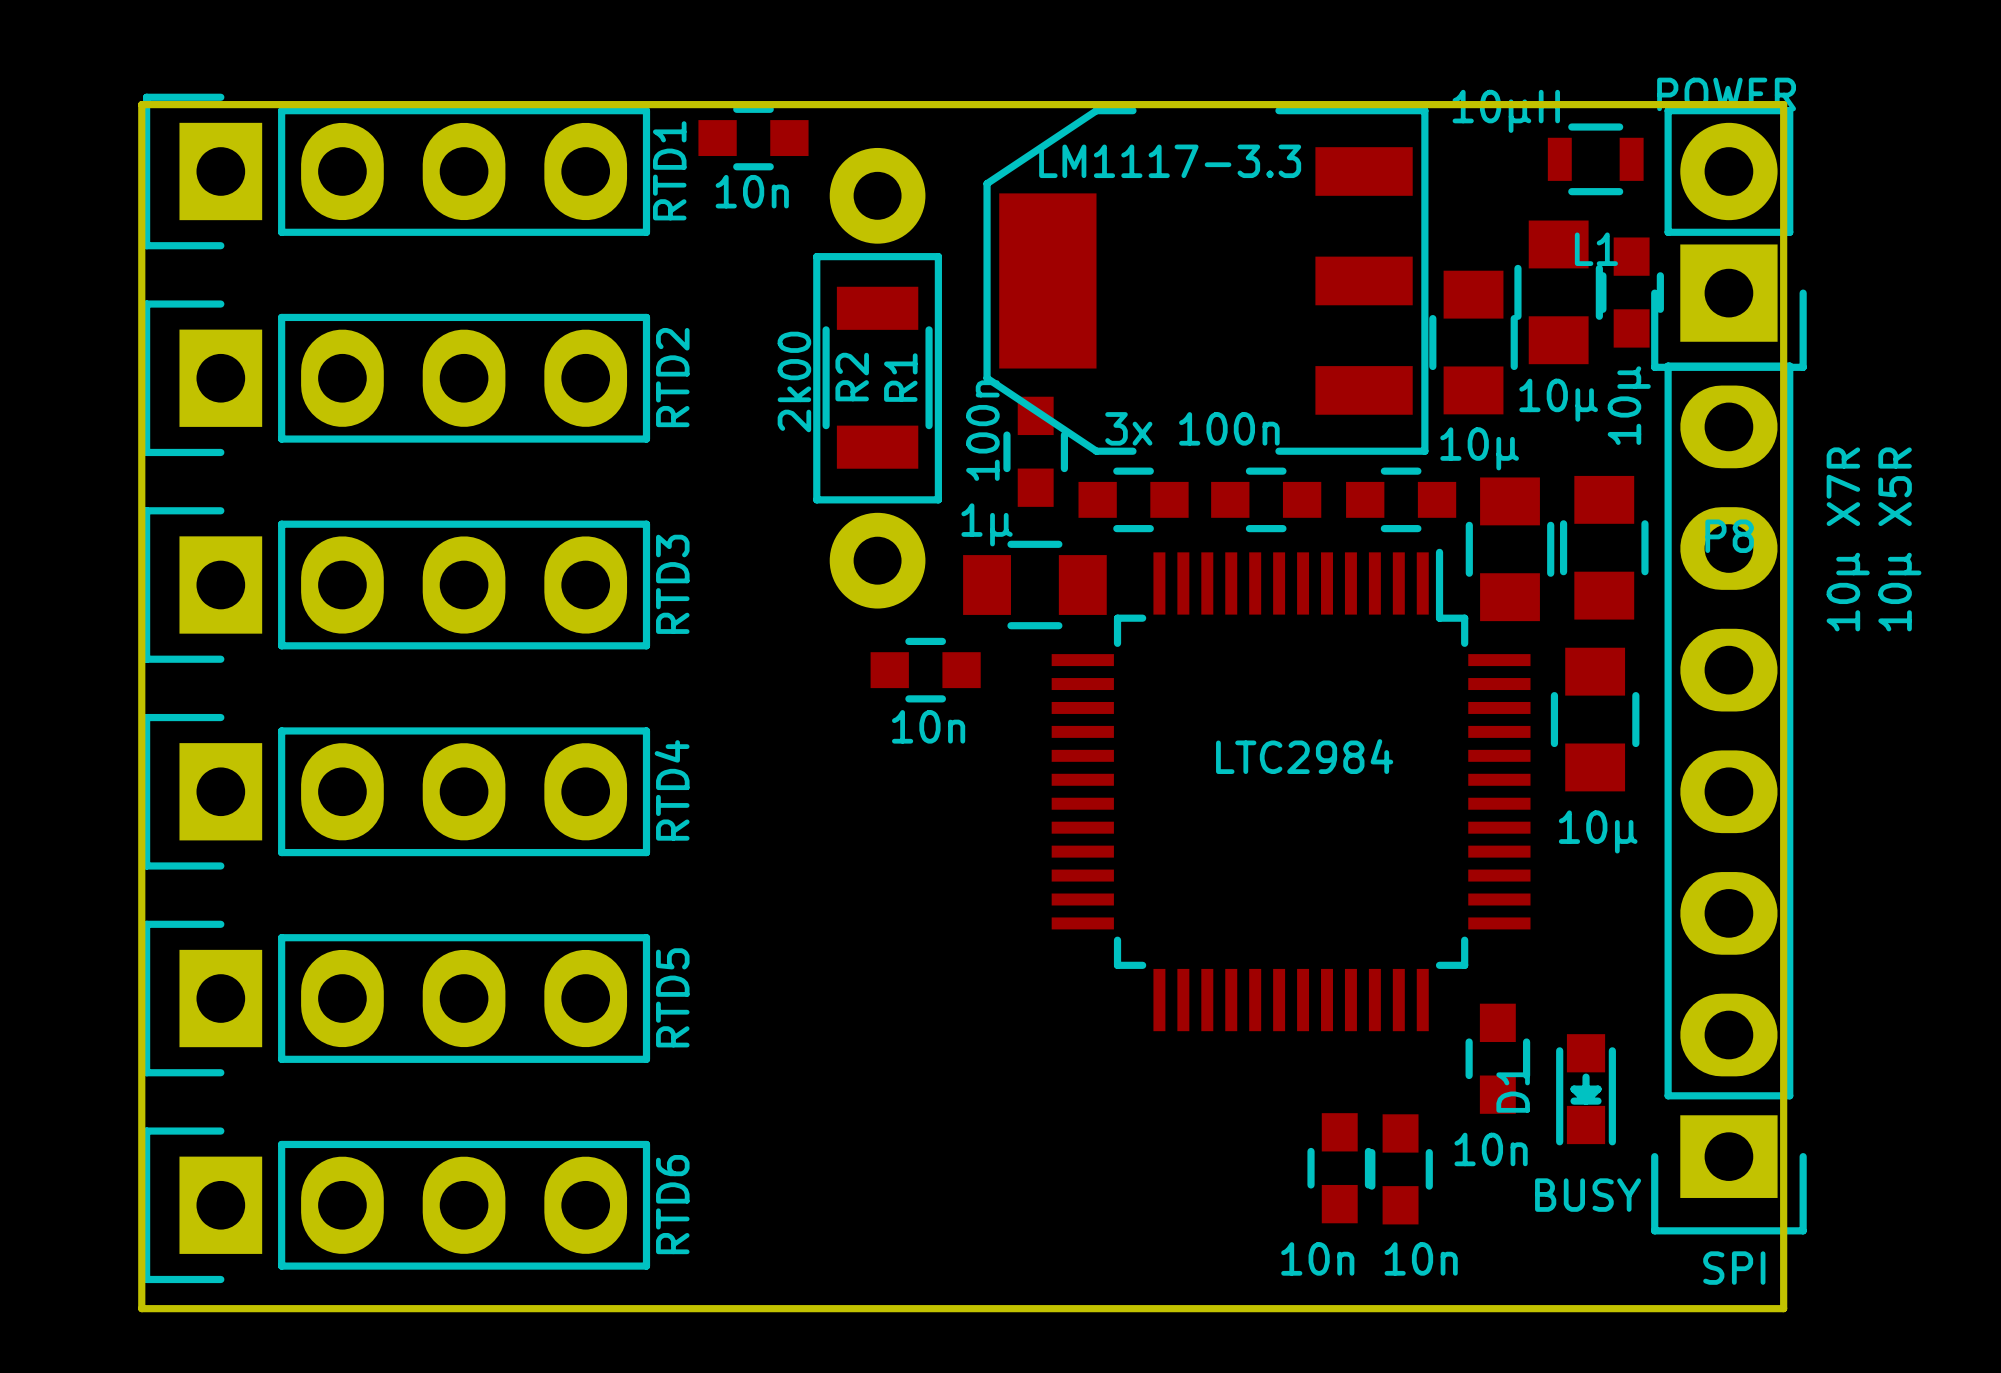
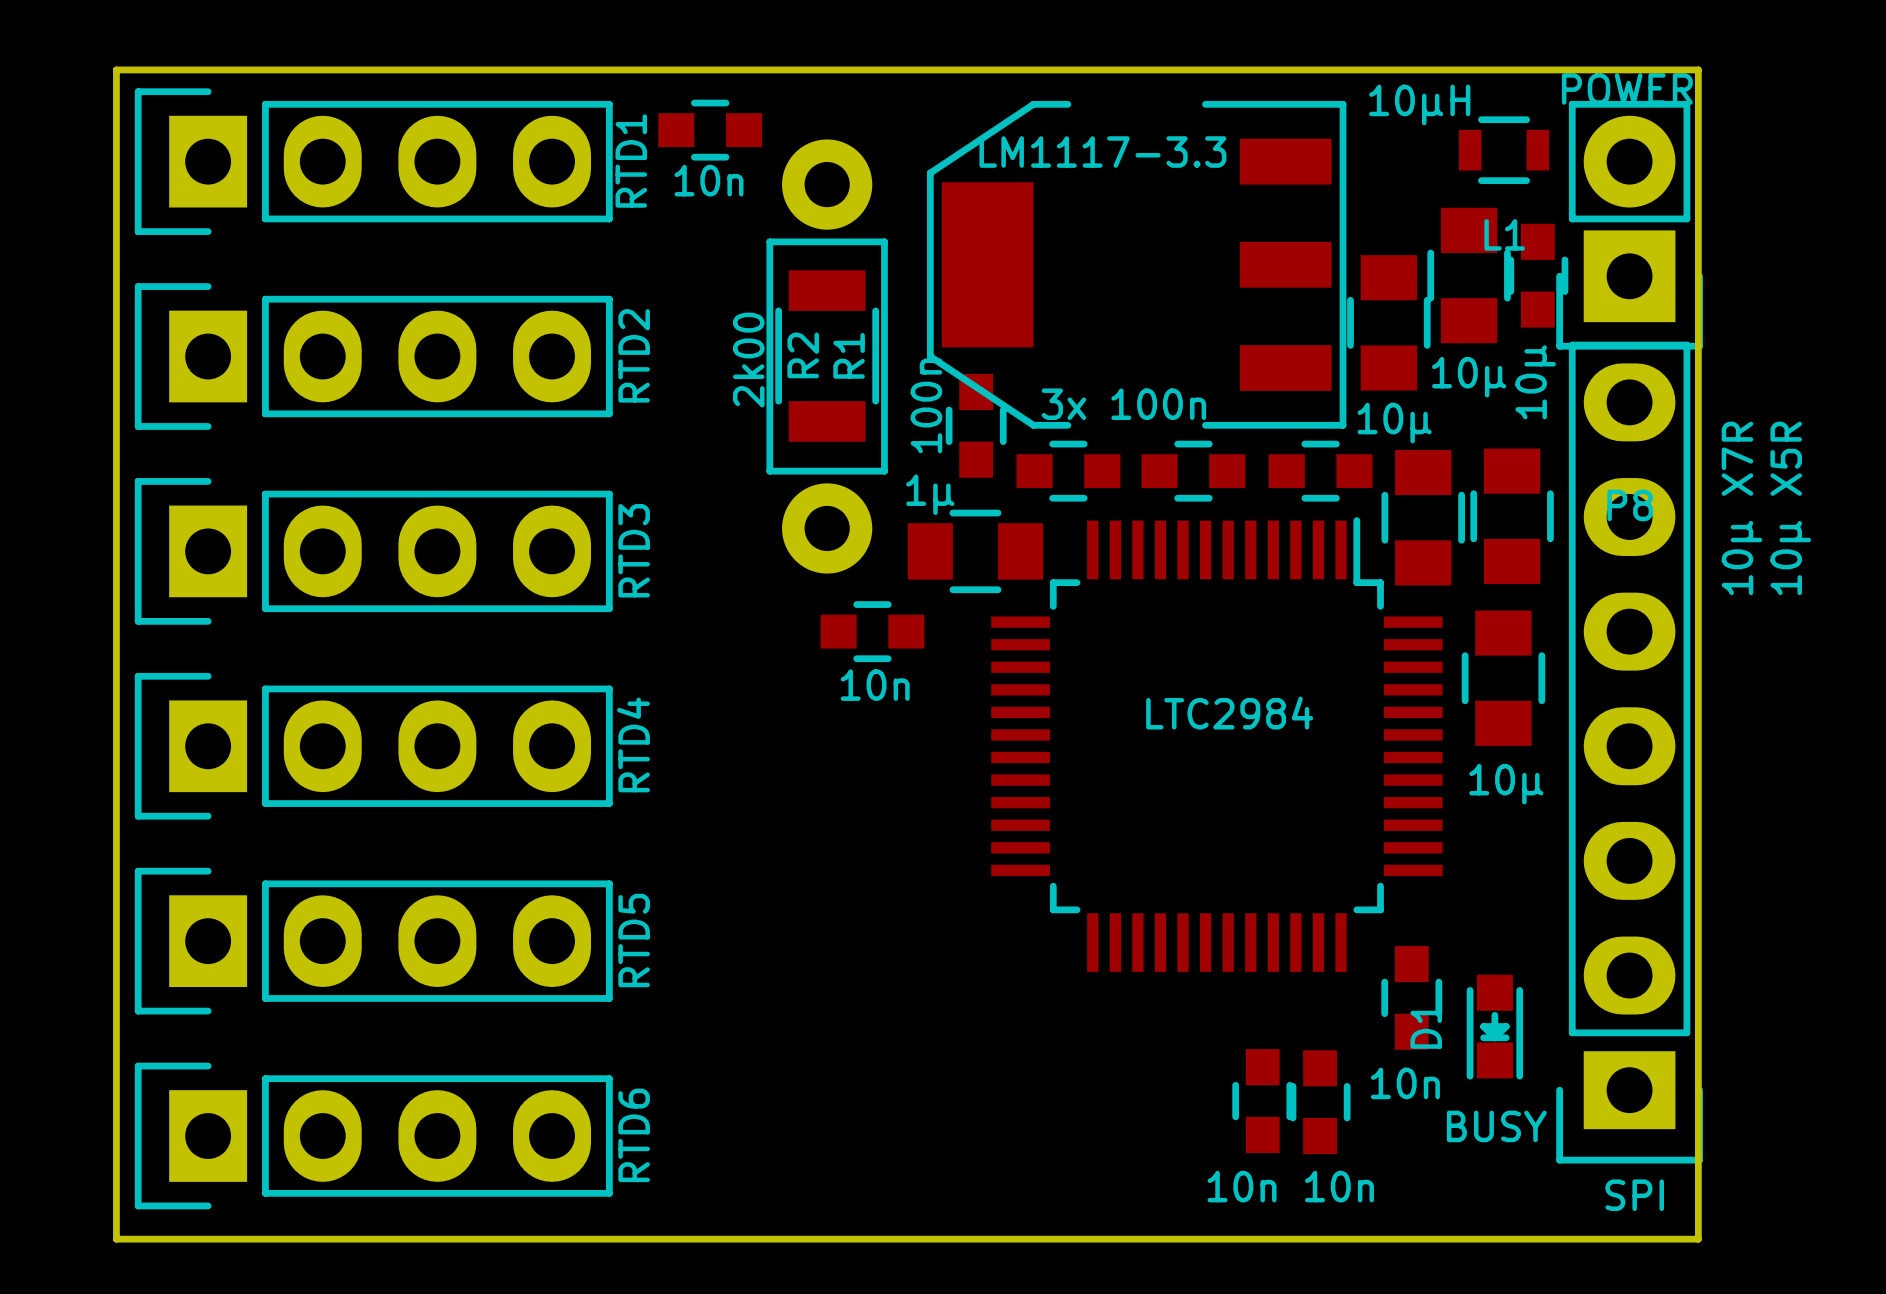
board edge: (141, 104) (141, 1308) (1783, 1308) (1783, 104) (141, 104) -> (116, 69) (116, 1239) (1698, 1239) (1698, 69) (116, 69)

